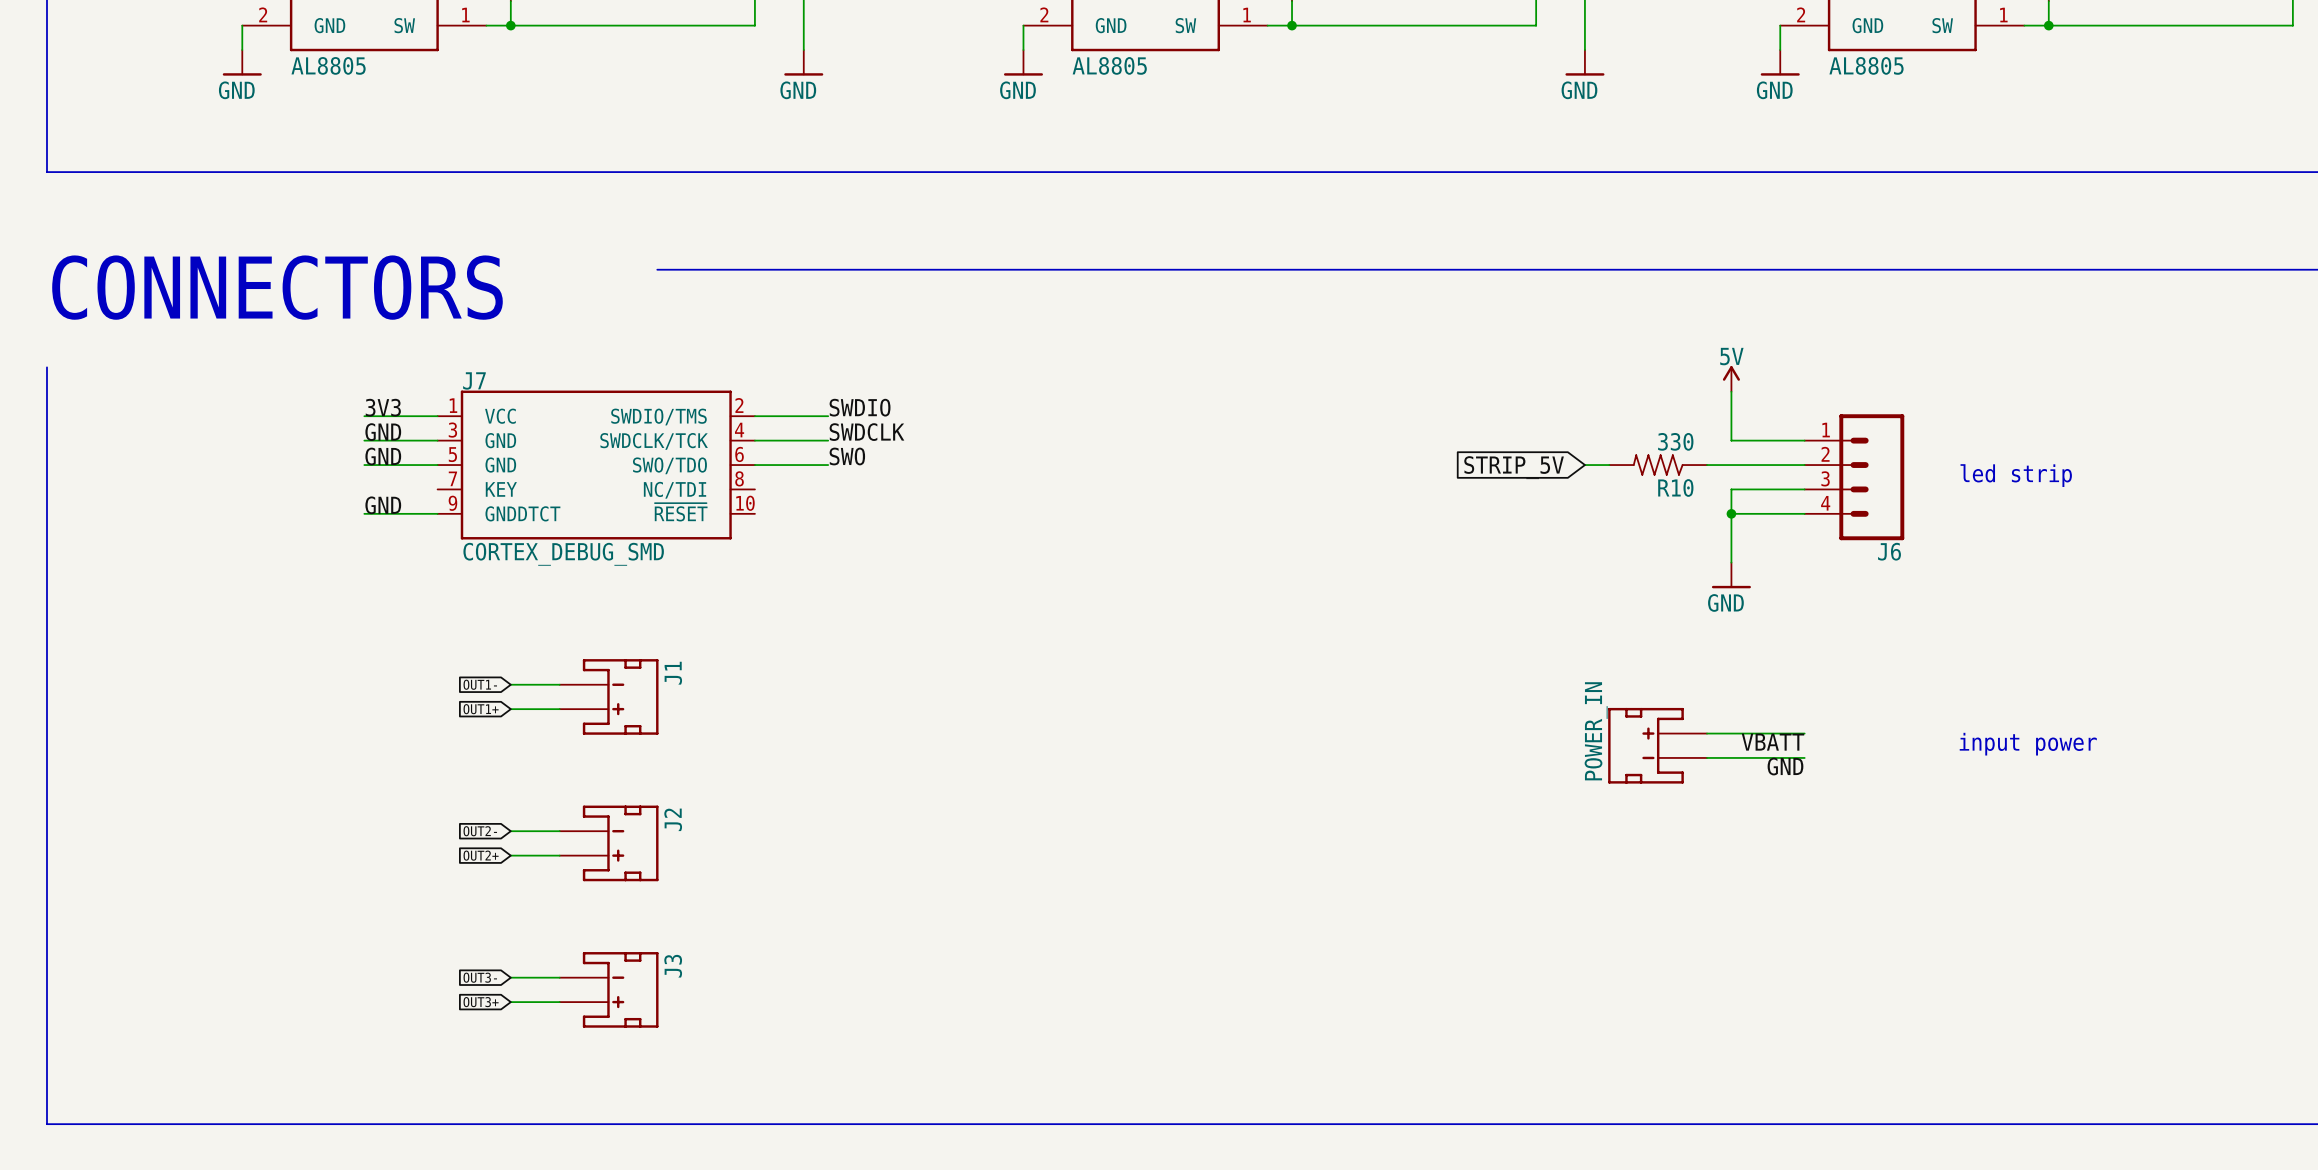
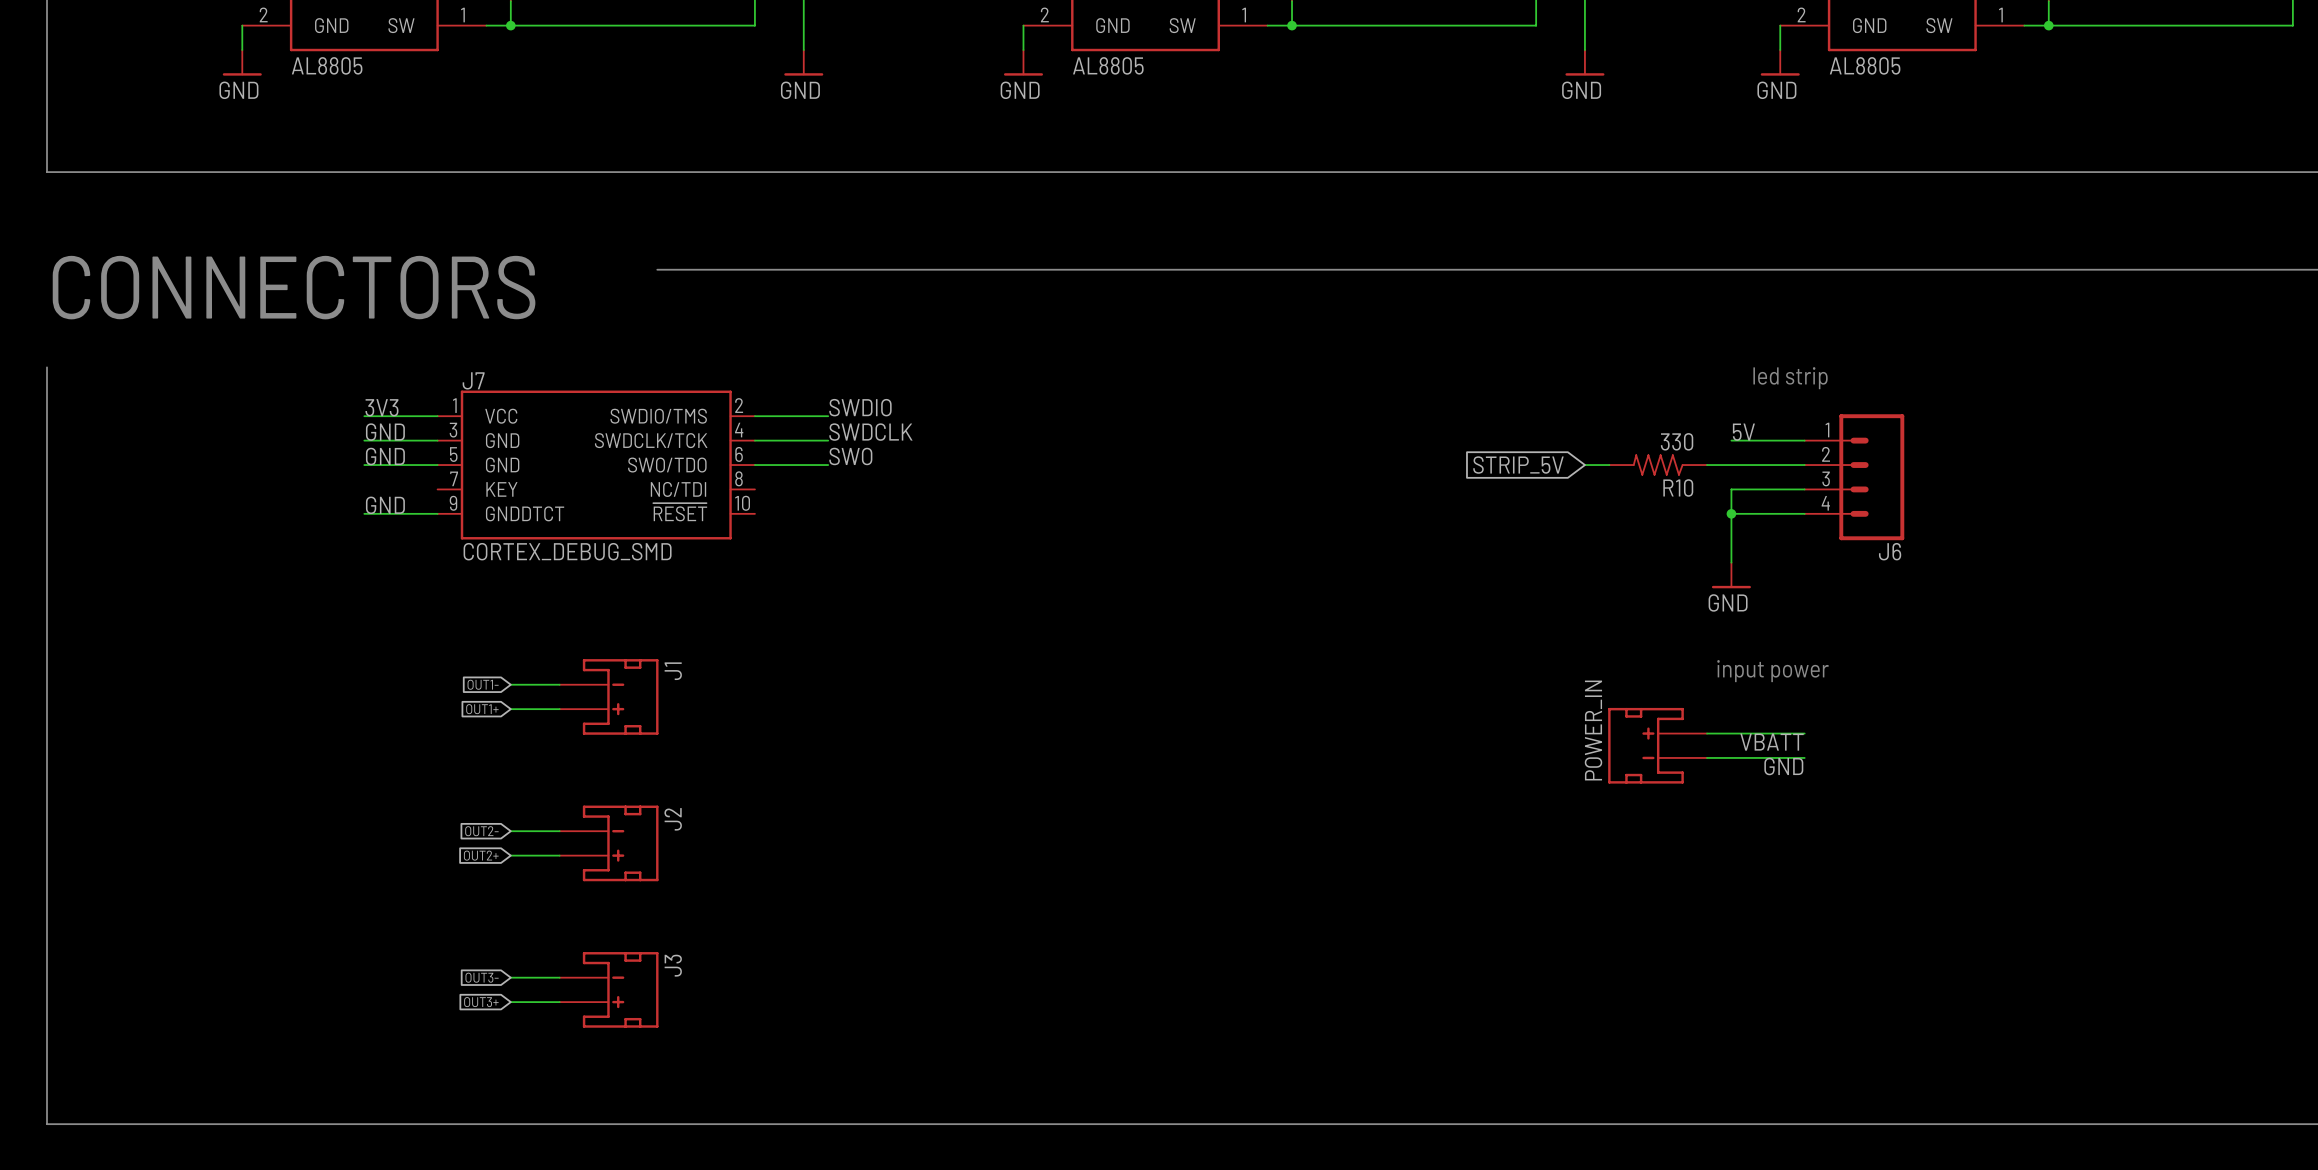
text: none -> led strip (1790, 378)
power symbol: 5V (1731, 378) -> none
wire: (1731, 391) (1731, 440) -> none
label: none -> 5V (1743, 432)
text: led strip (2016, 475) -> none
text: none -> input power (1773, 671)
text: input power (2028, 744) -> none

